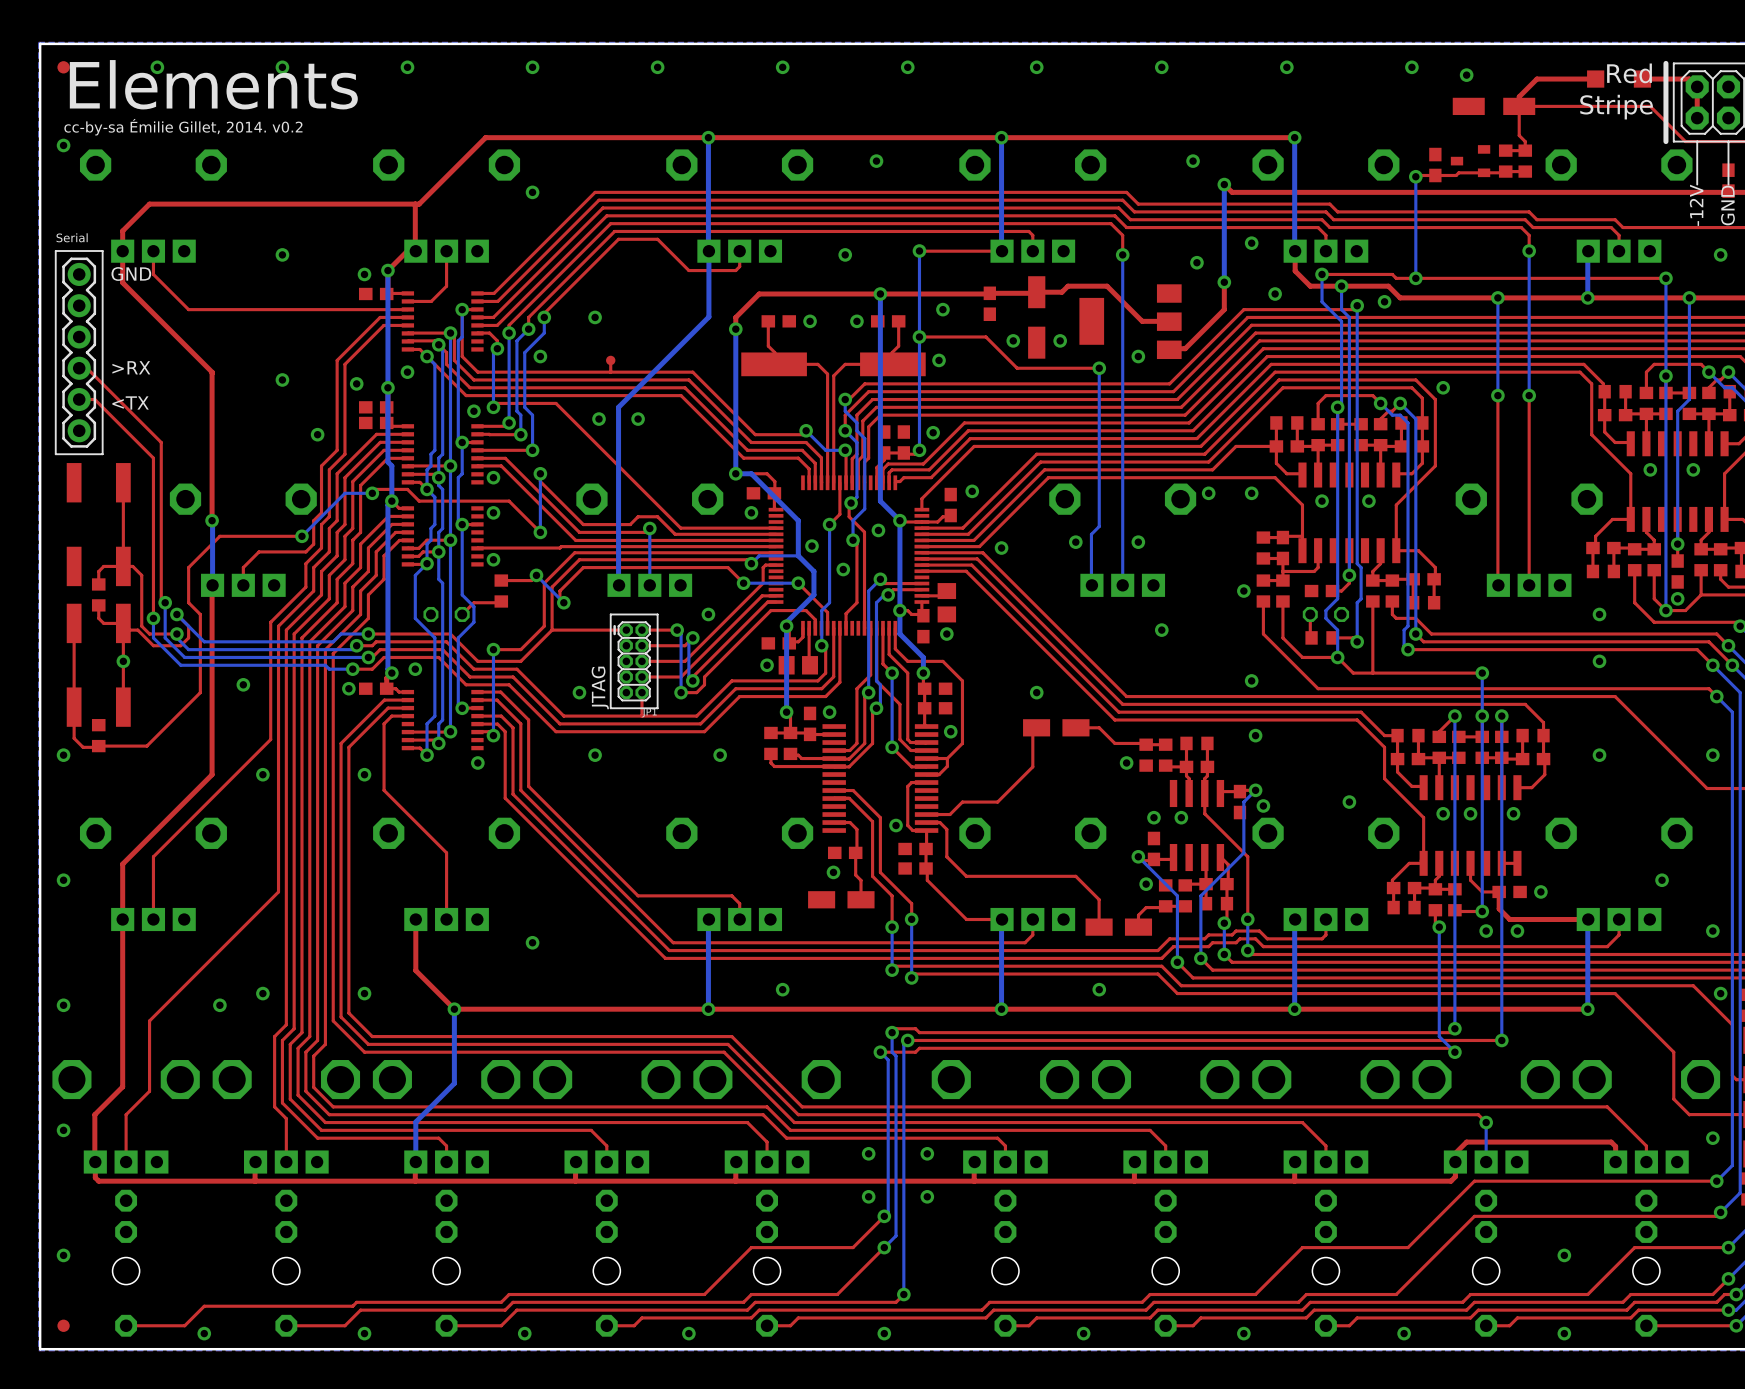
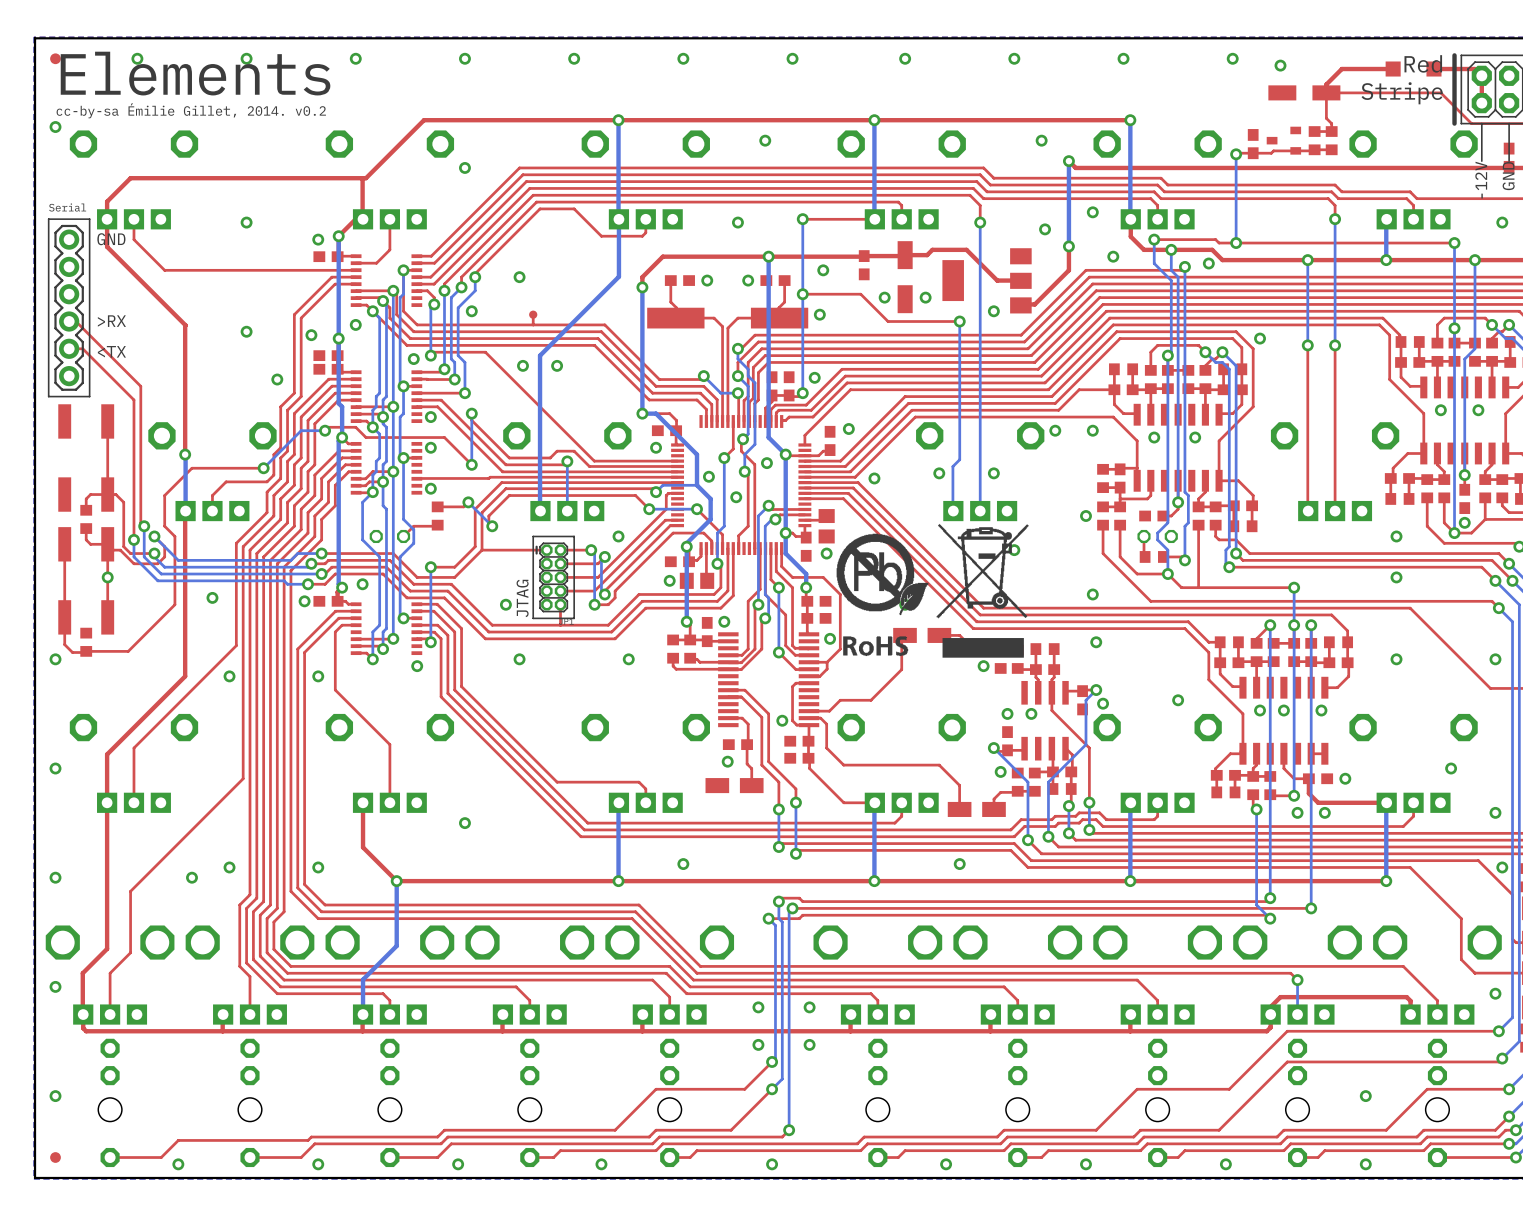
drawing: none -> [836, 523, 1029, 658]

